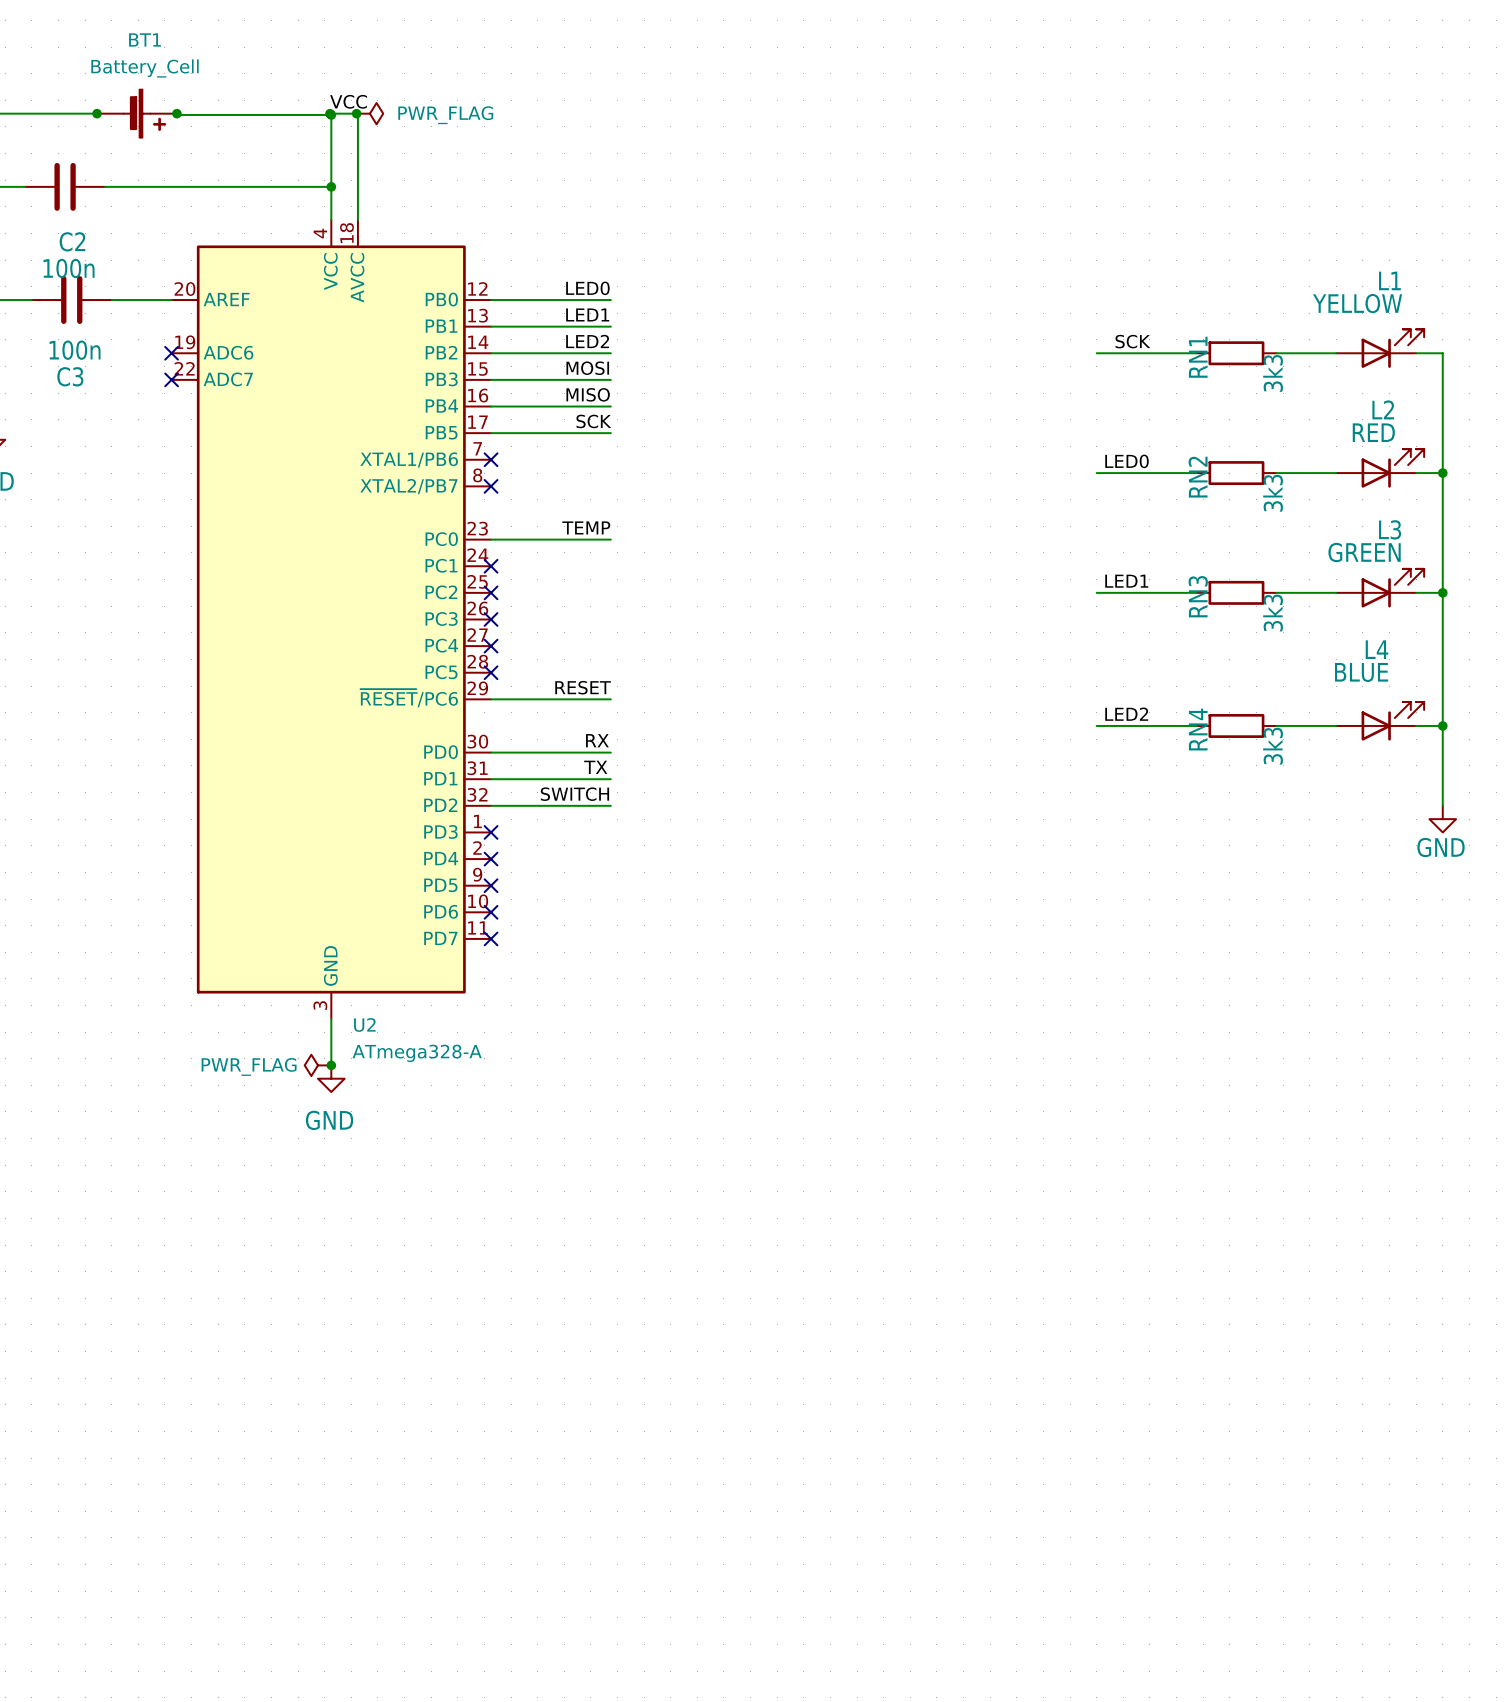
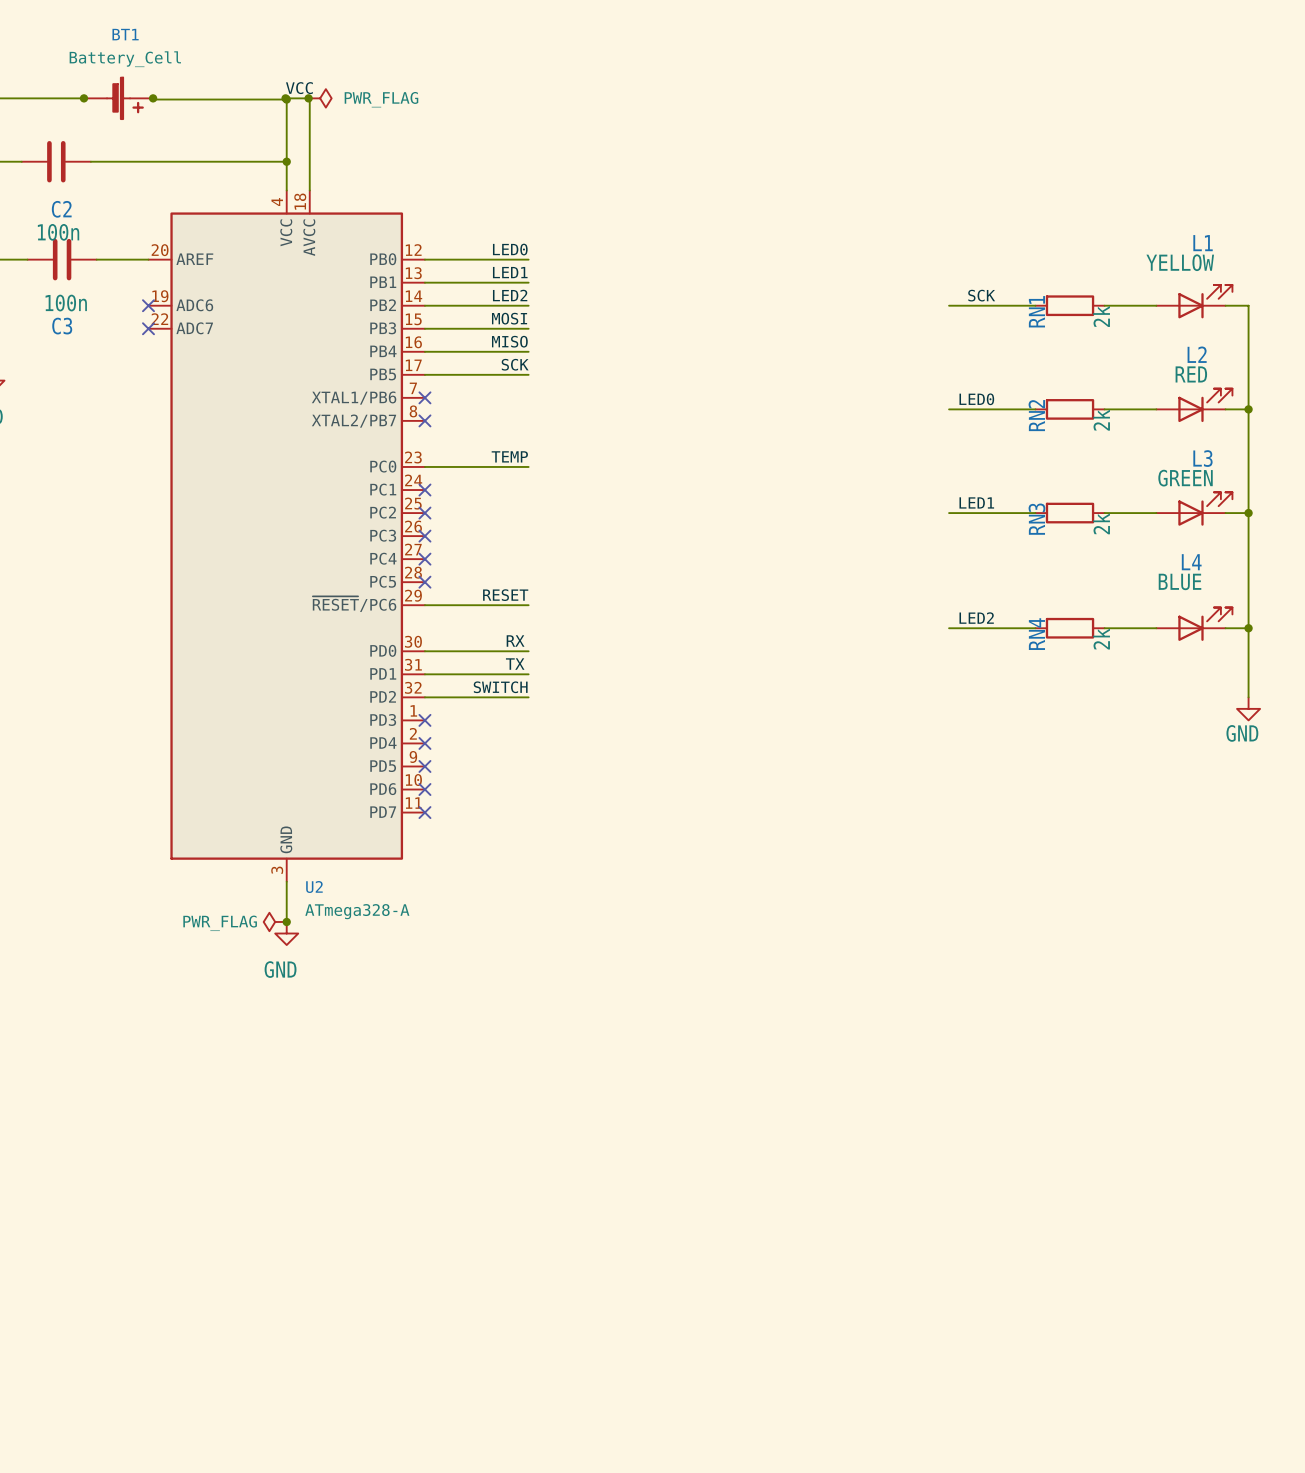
RN1 value: 3k3 (1273, 373) -> 2k (1101, 316)
RN2 value: 3k3 (1273, 493) -> 2k (1101, 420)
RN3 value: 3k3 (1273, 613) -> 2k (1101, 523)
RN4 value: 3k3 (1273, 746) -> 2k (1101, 639)

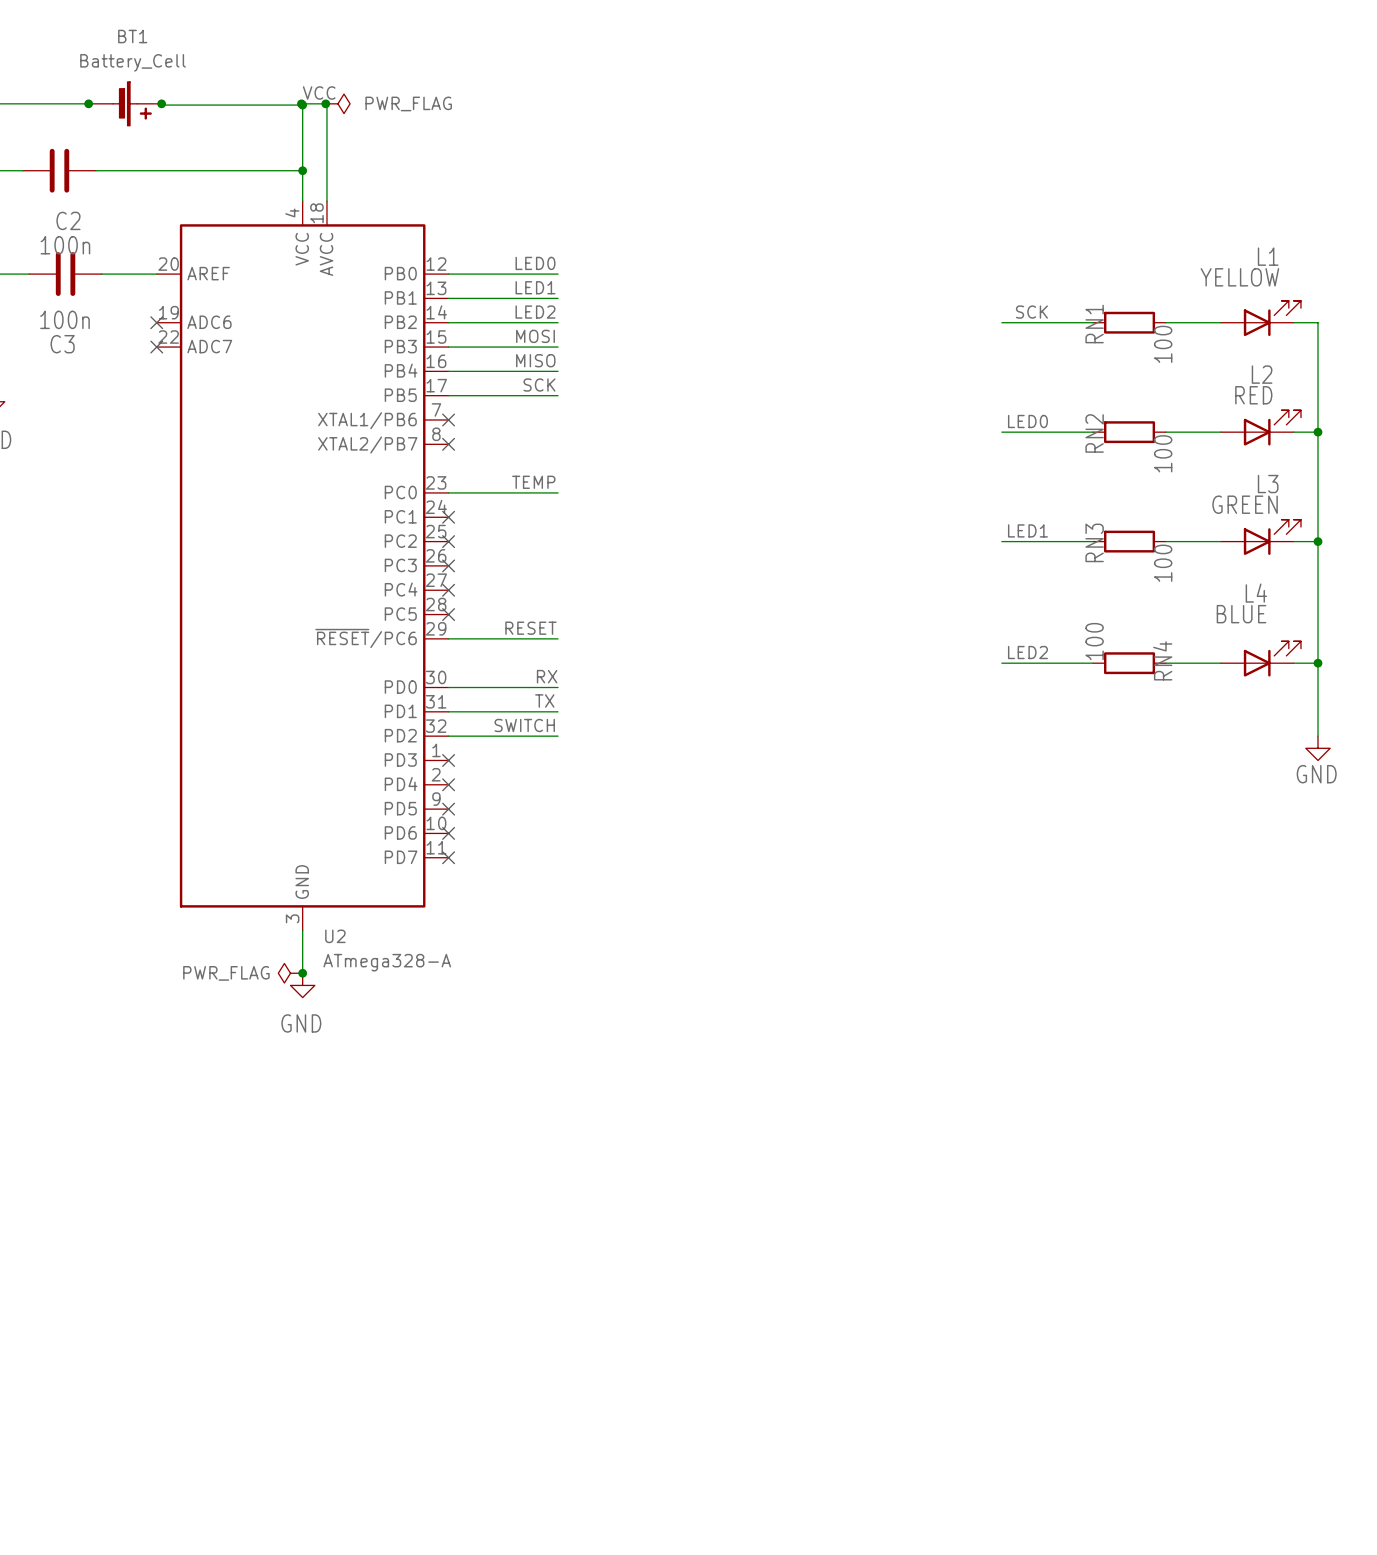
RN1 value: 2k (1101, 316) -> 100 (1163, 344)
RN2 value: 2k (1101, 420) -> 100 (1163, 453)
RN3 value: 2k (1101, 523) -> 100 (1163, 563)
RN4 name position: RN4 (1036, 634) -> RN4 (1162, 660)
RN4 value: 2k (1101, 639) -> 100 (1094, 641)

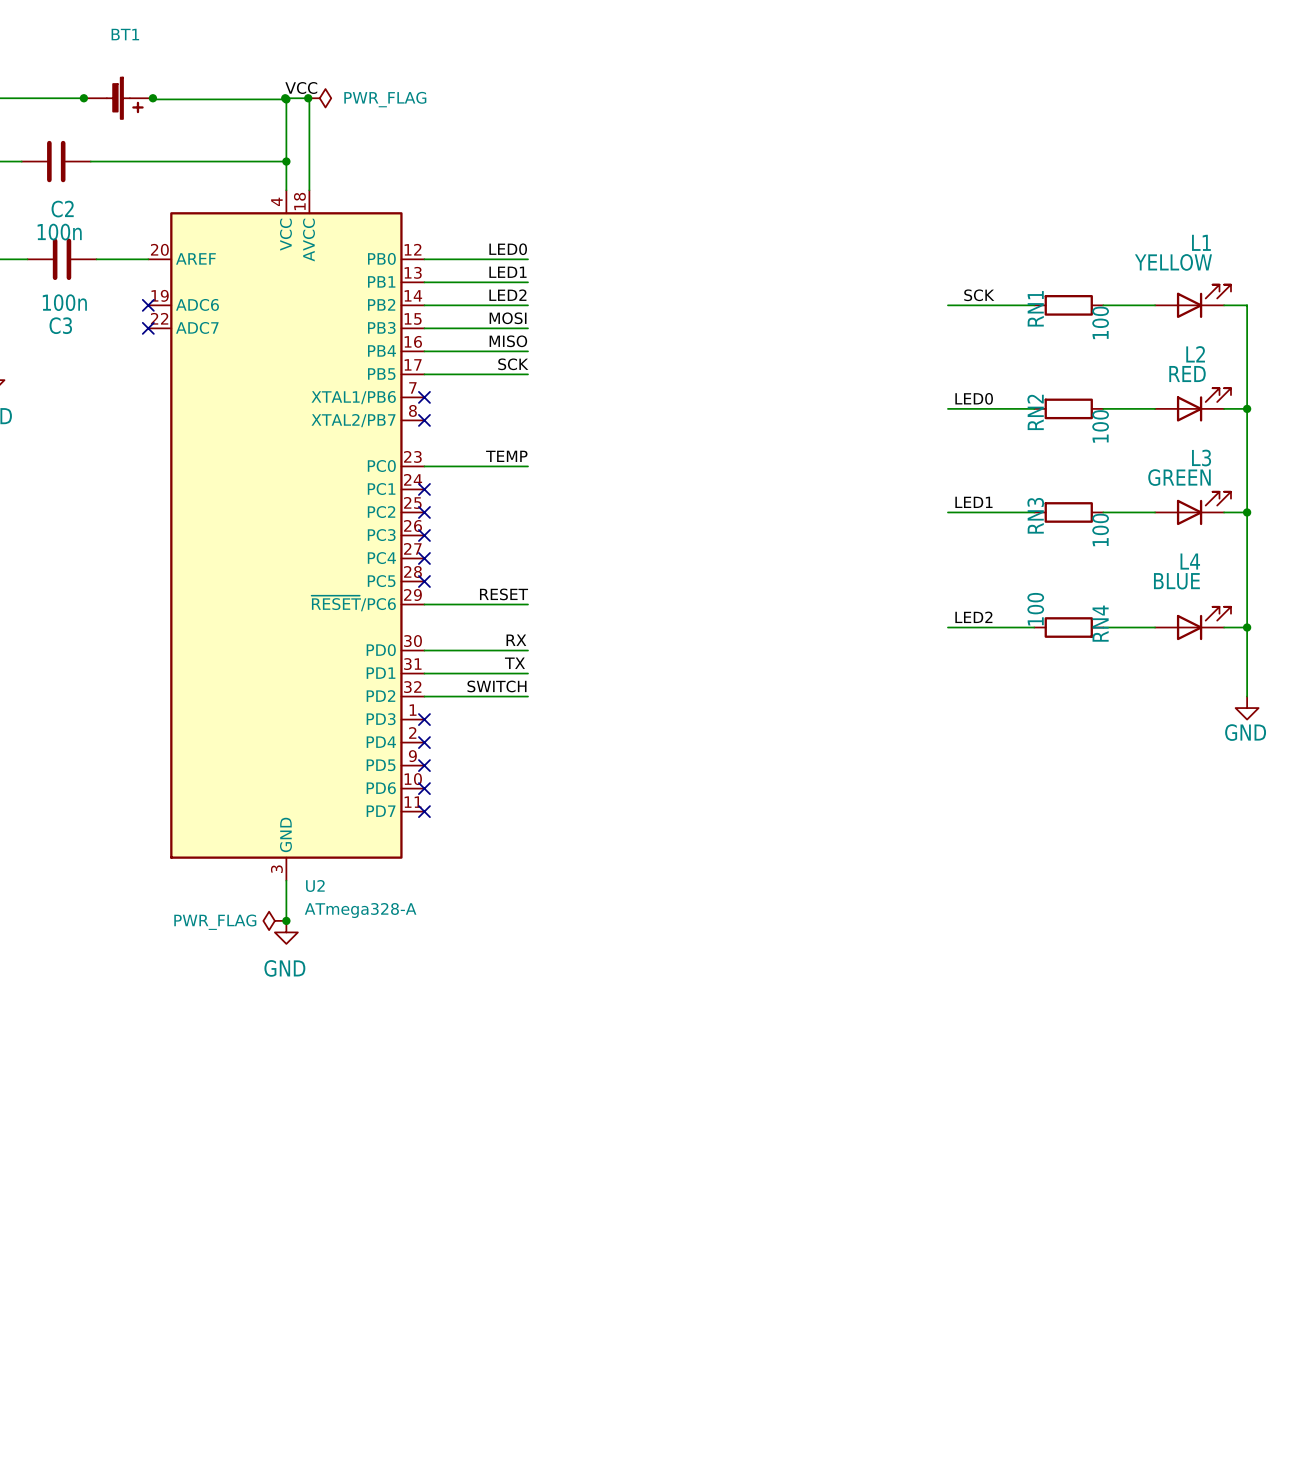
BT1 value: Battery_Cell (133, 62) -> none

